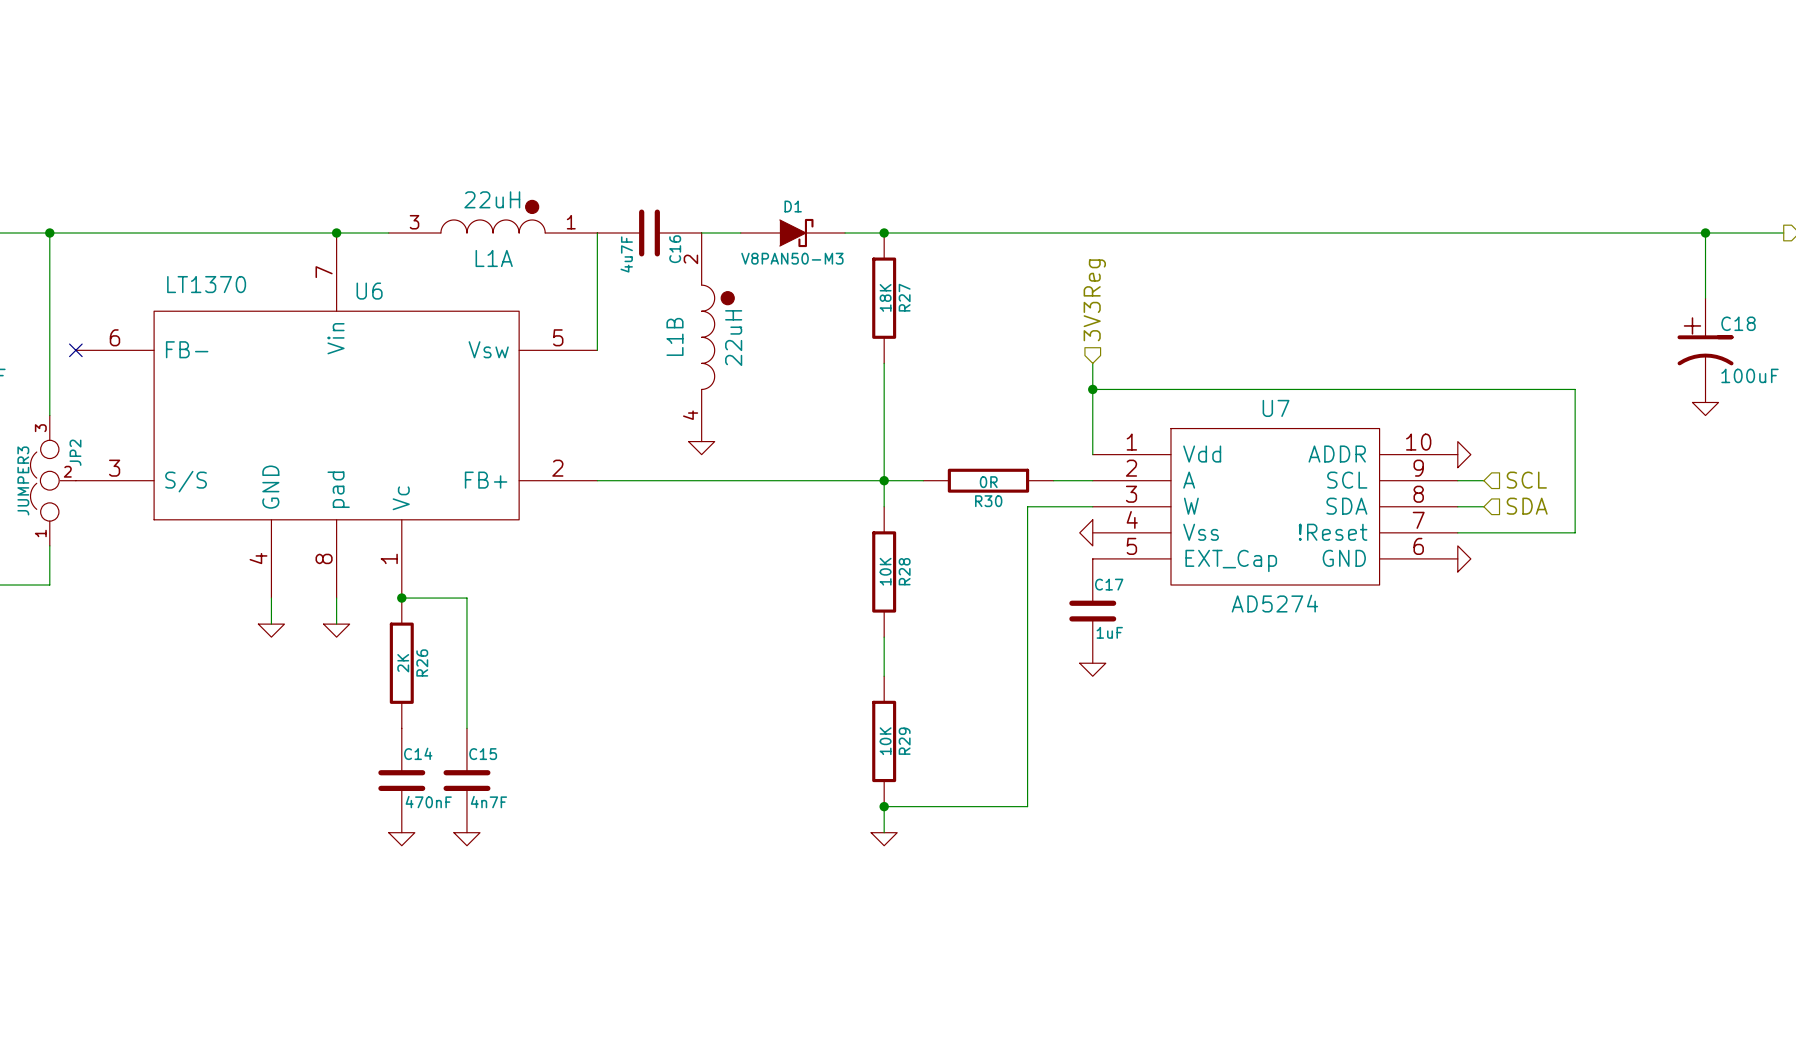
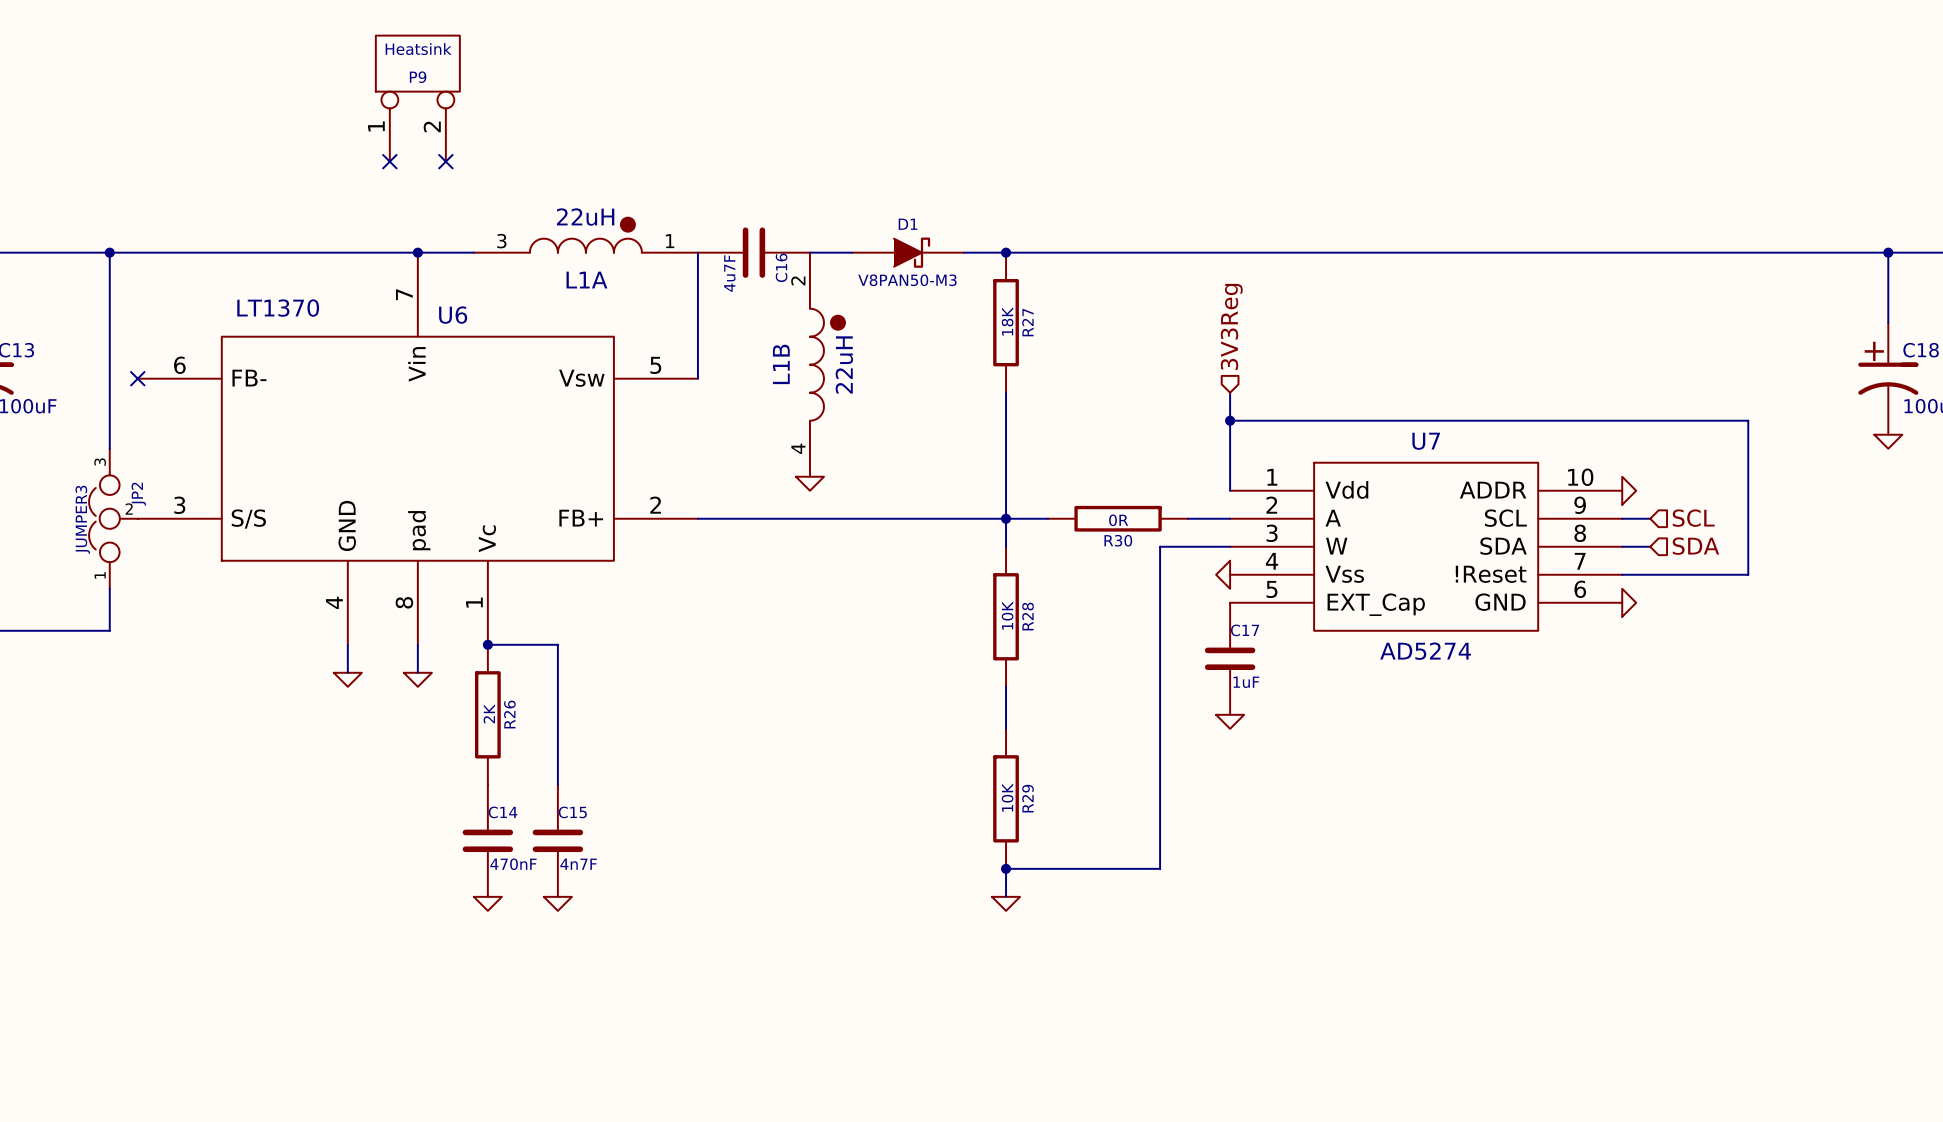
P9: none -> Heatsink (417, 98)
no-connect mark: none -> (389, 161)
no-connect mark: none -> (445, 161)

